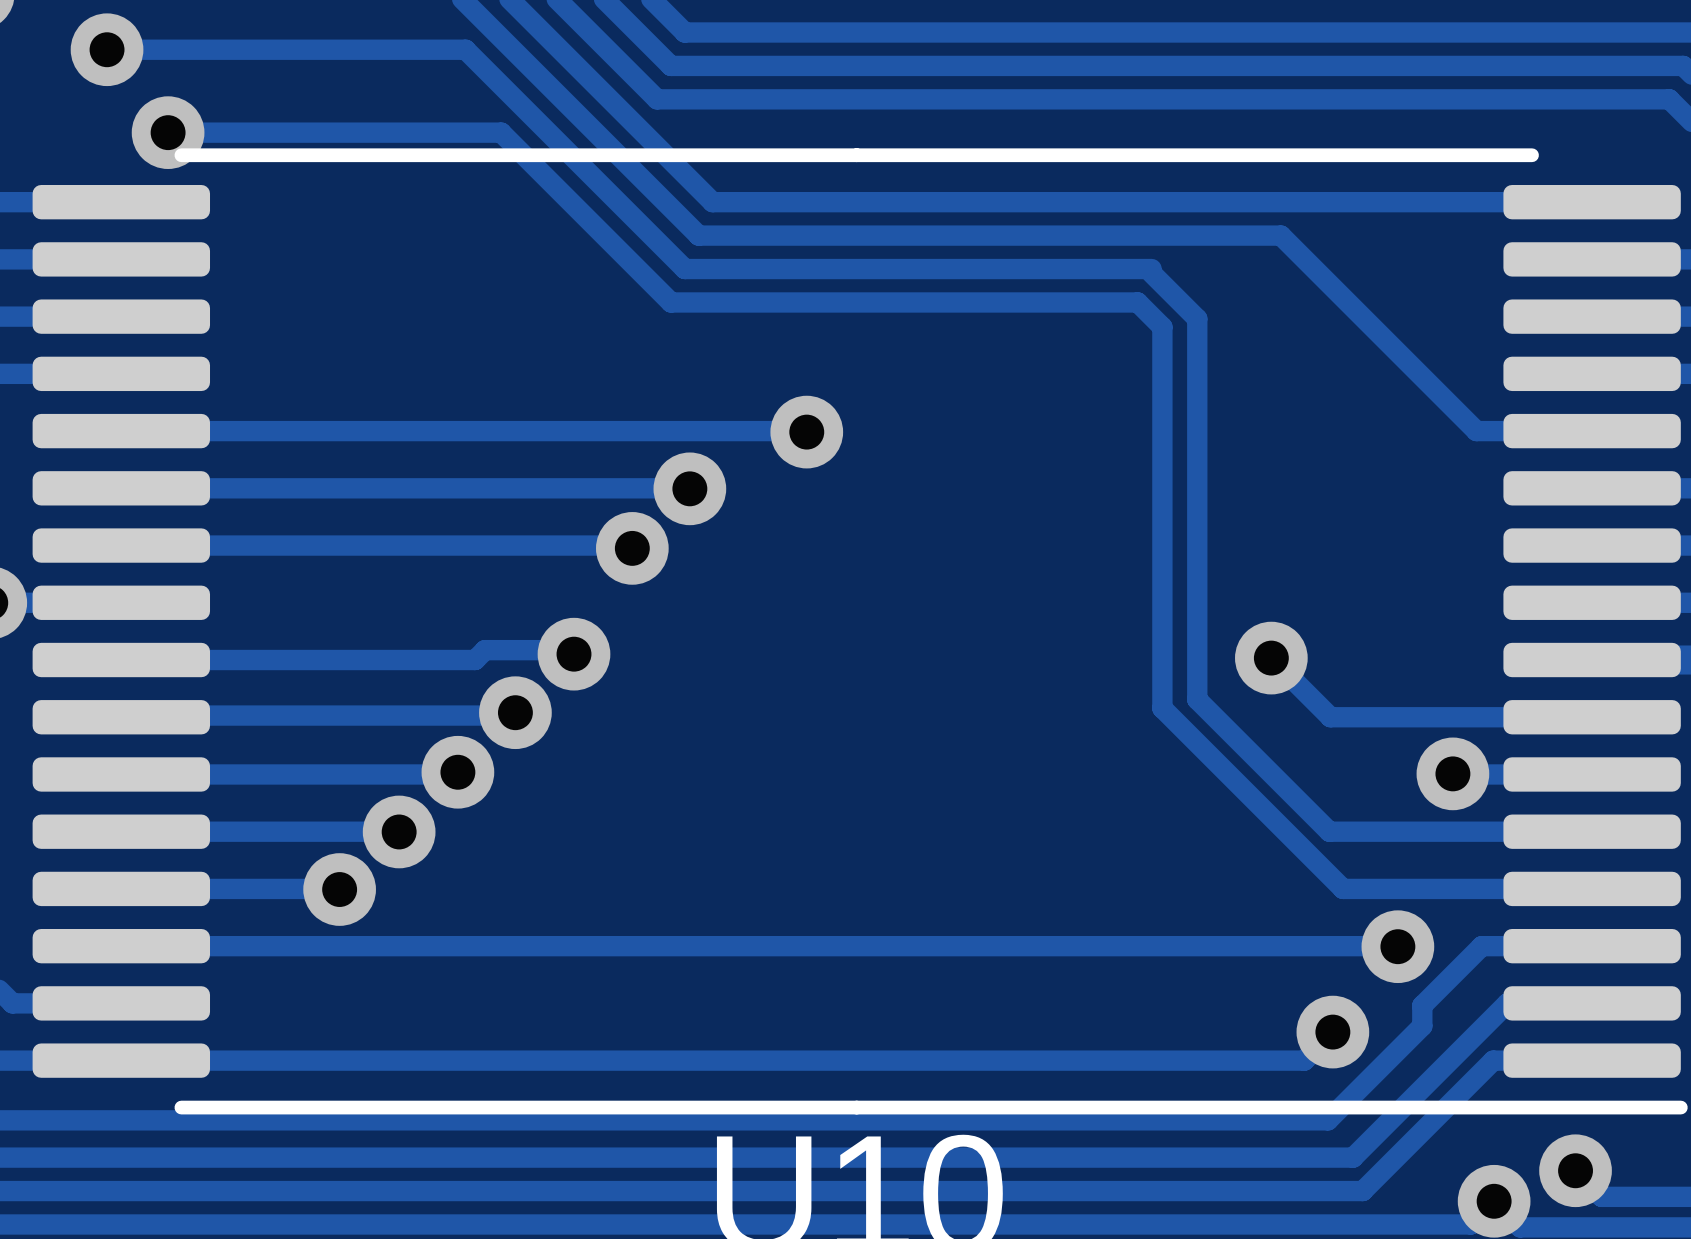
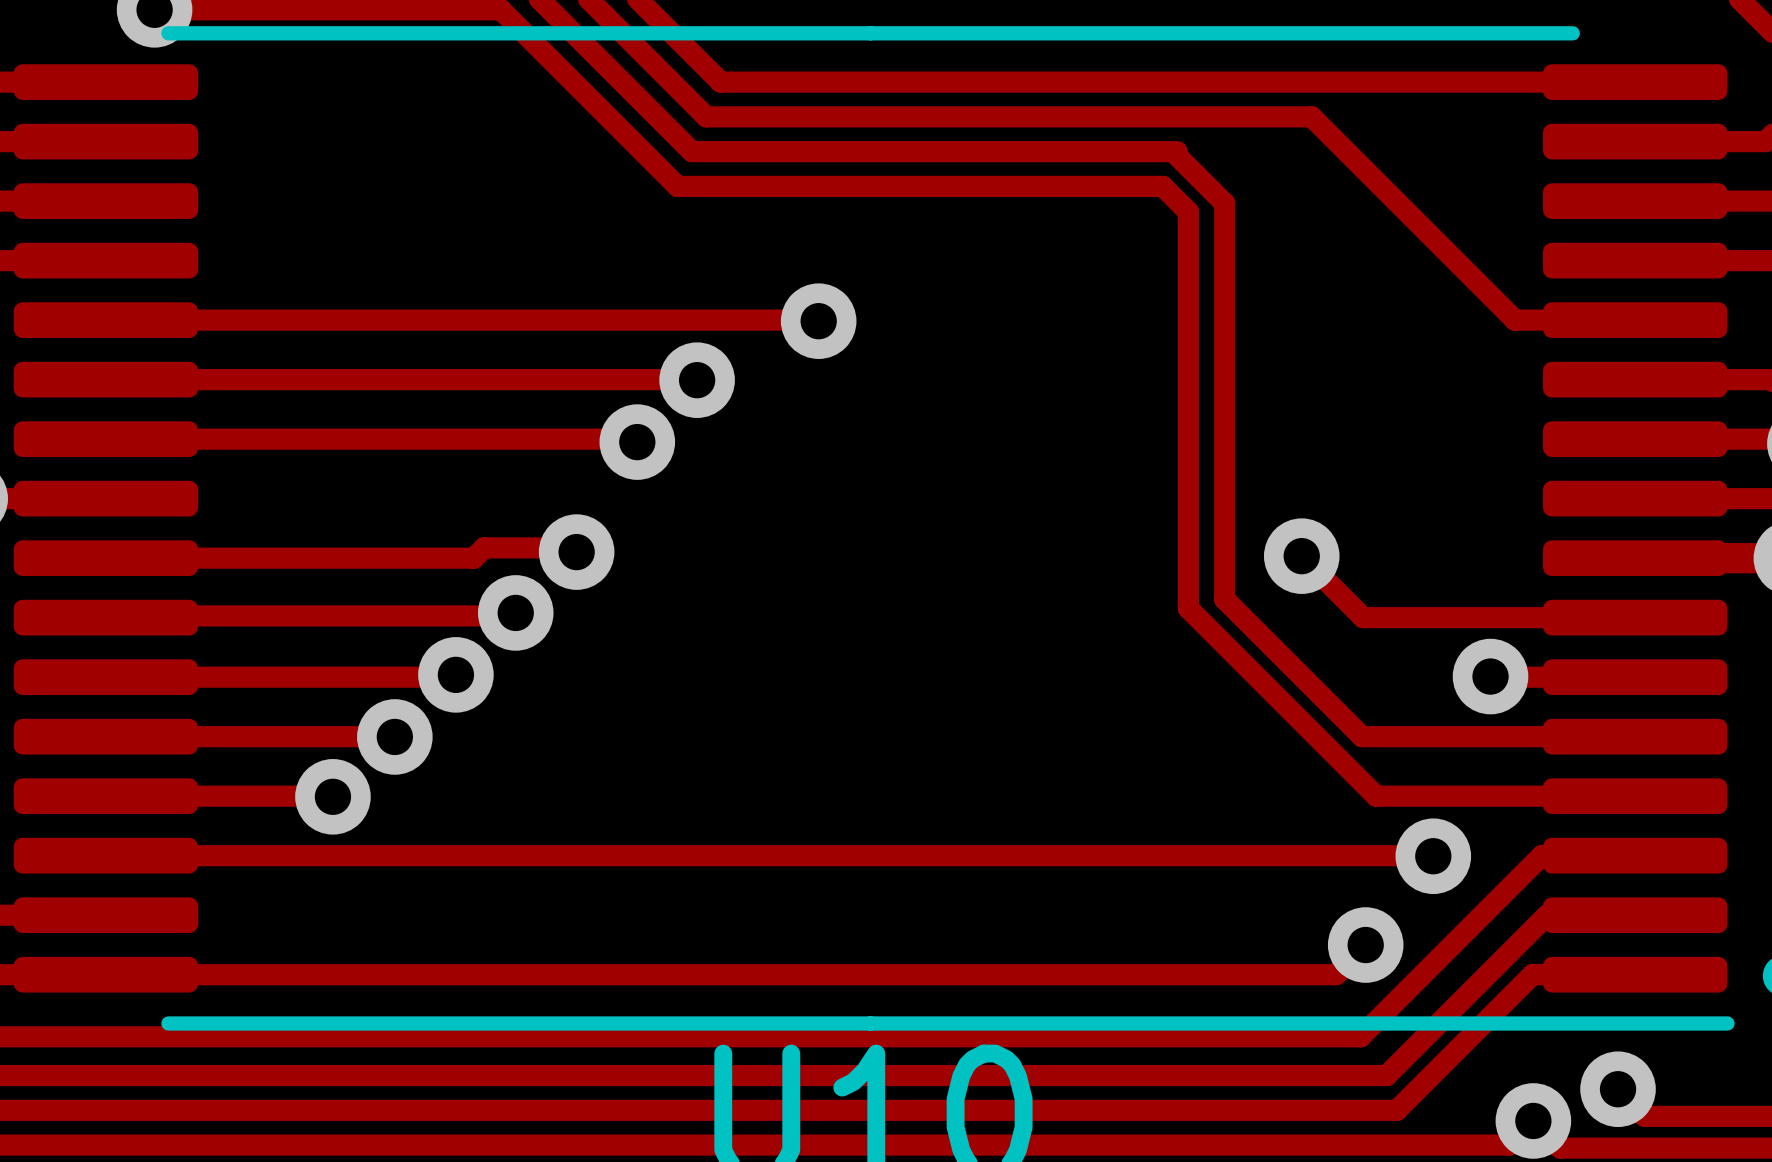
track: (1502, 946) (1481, 946) (1422, 1005) (1422, 1026) -> (1541, 855) (1458, 938)

